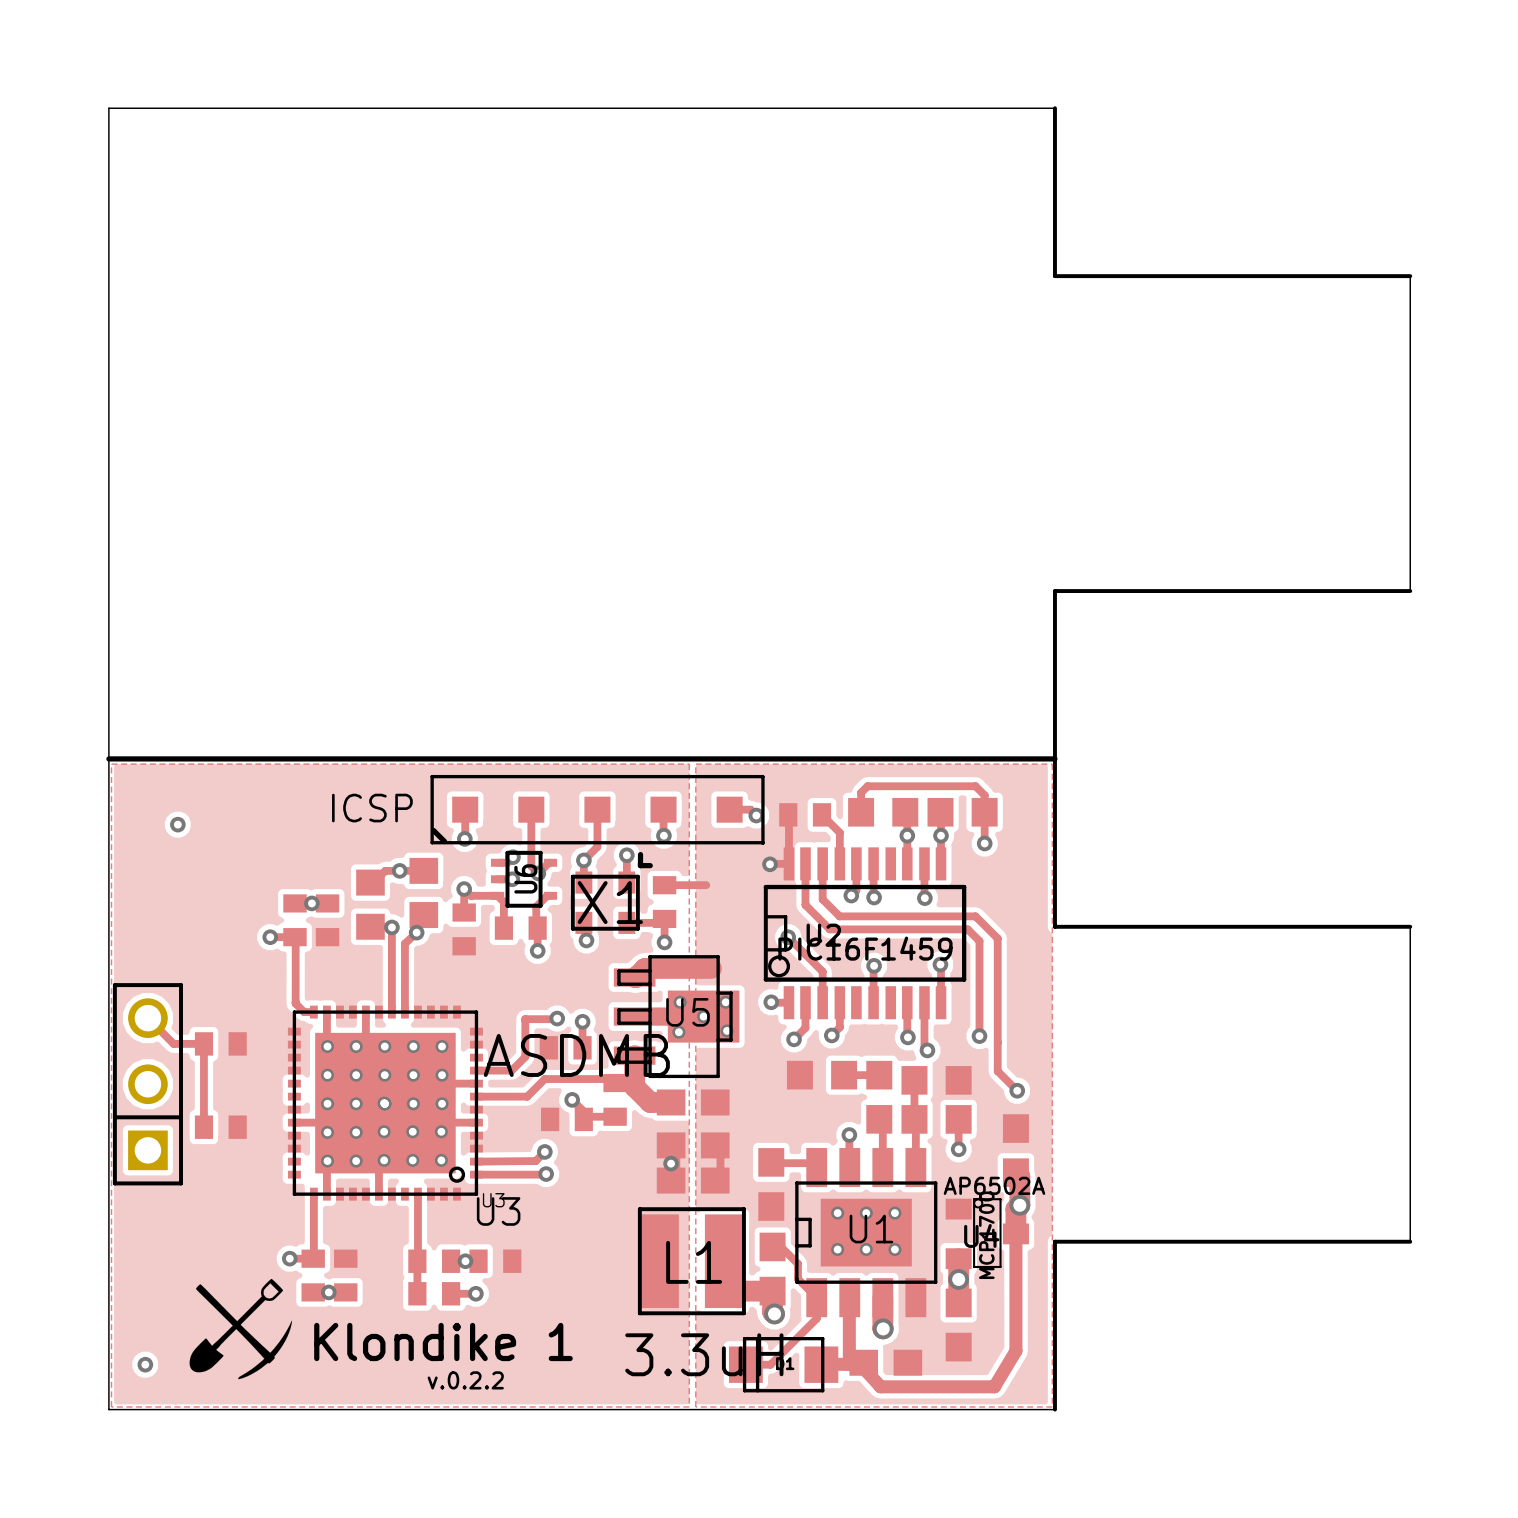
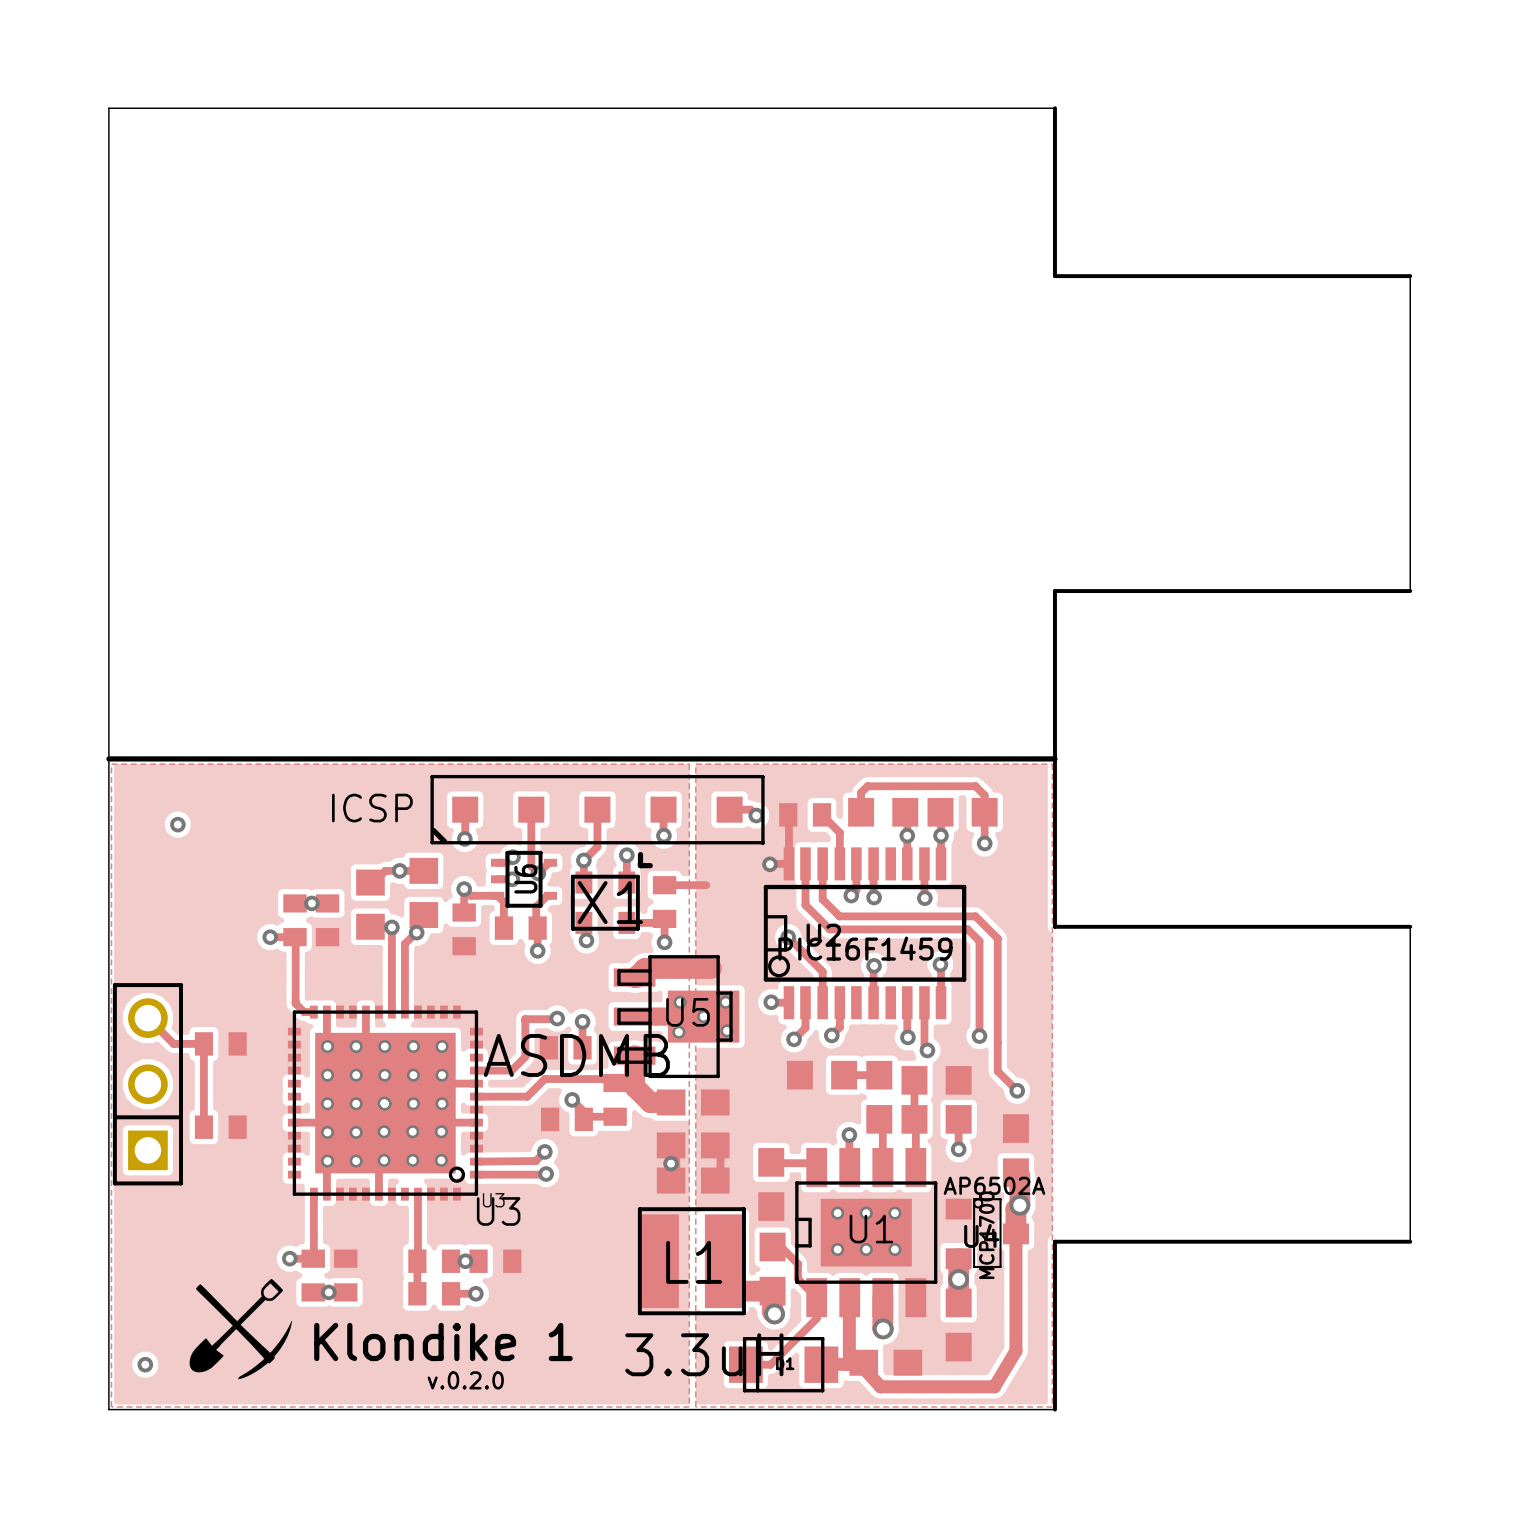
text: v.0.2.2 (465, 1380) -> v.0.2.0 (465, 1380)

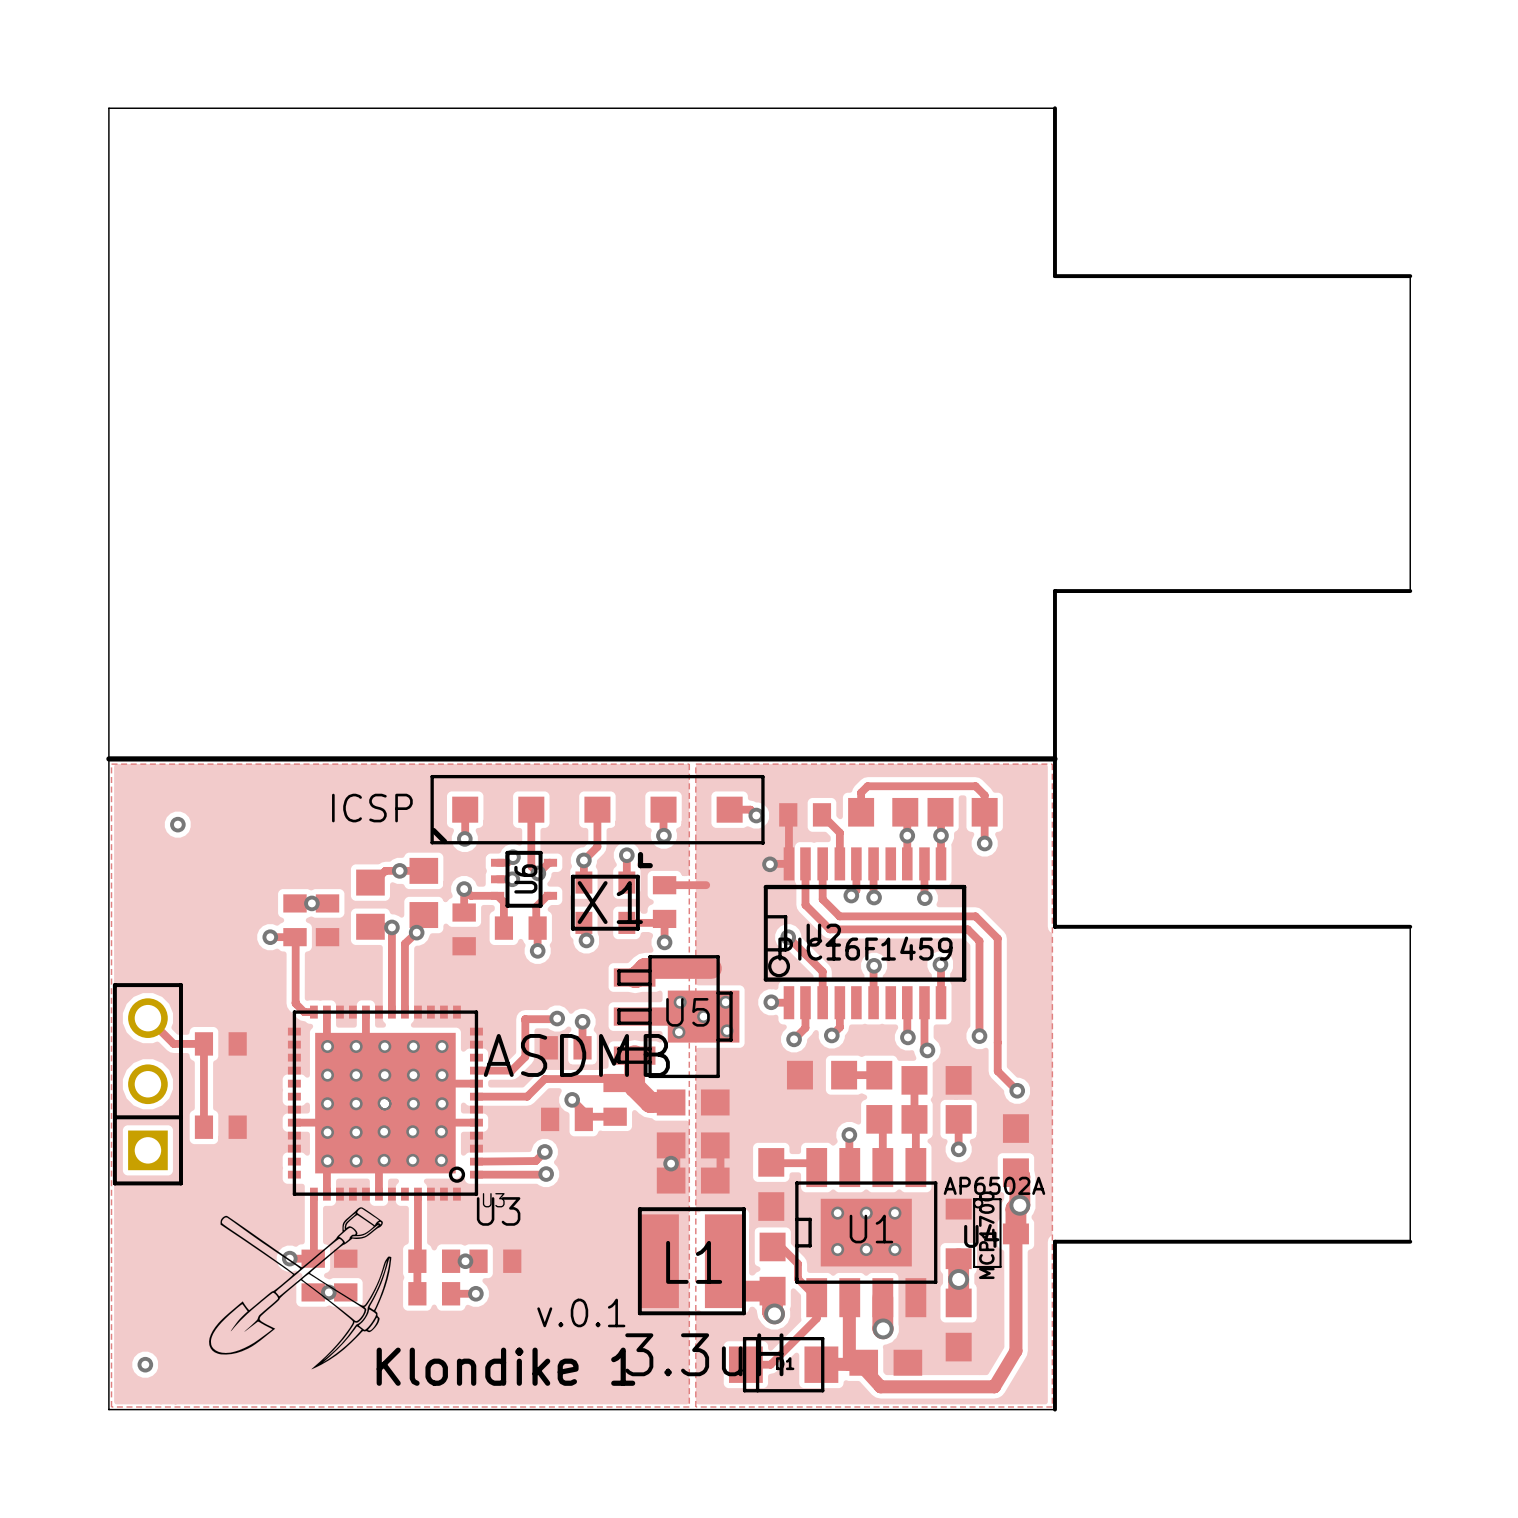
drawing: none -> [209, 1207, 392, 1370]
drawing: [189, 1278, 293, 1380] -> none
text: none -> v.0.1 (581, 1312)
text position: Klondike 1 (443, 1341) -> Klondike 1 (505, 1366)
text: v.0.2.0 (465, 1380) -> none

